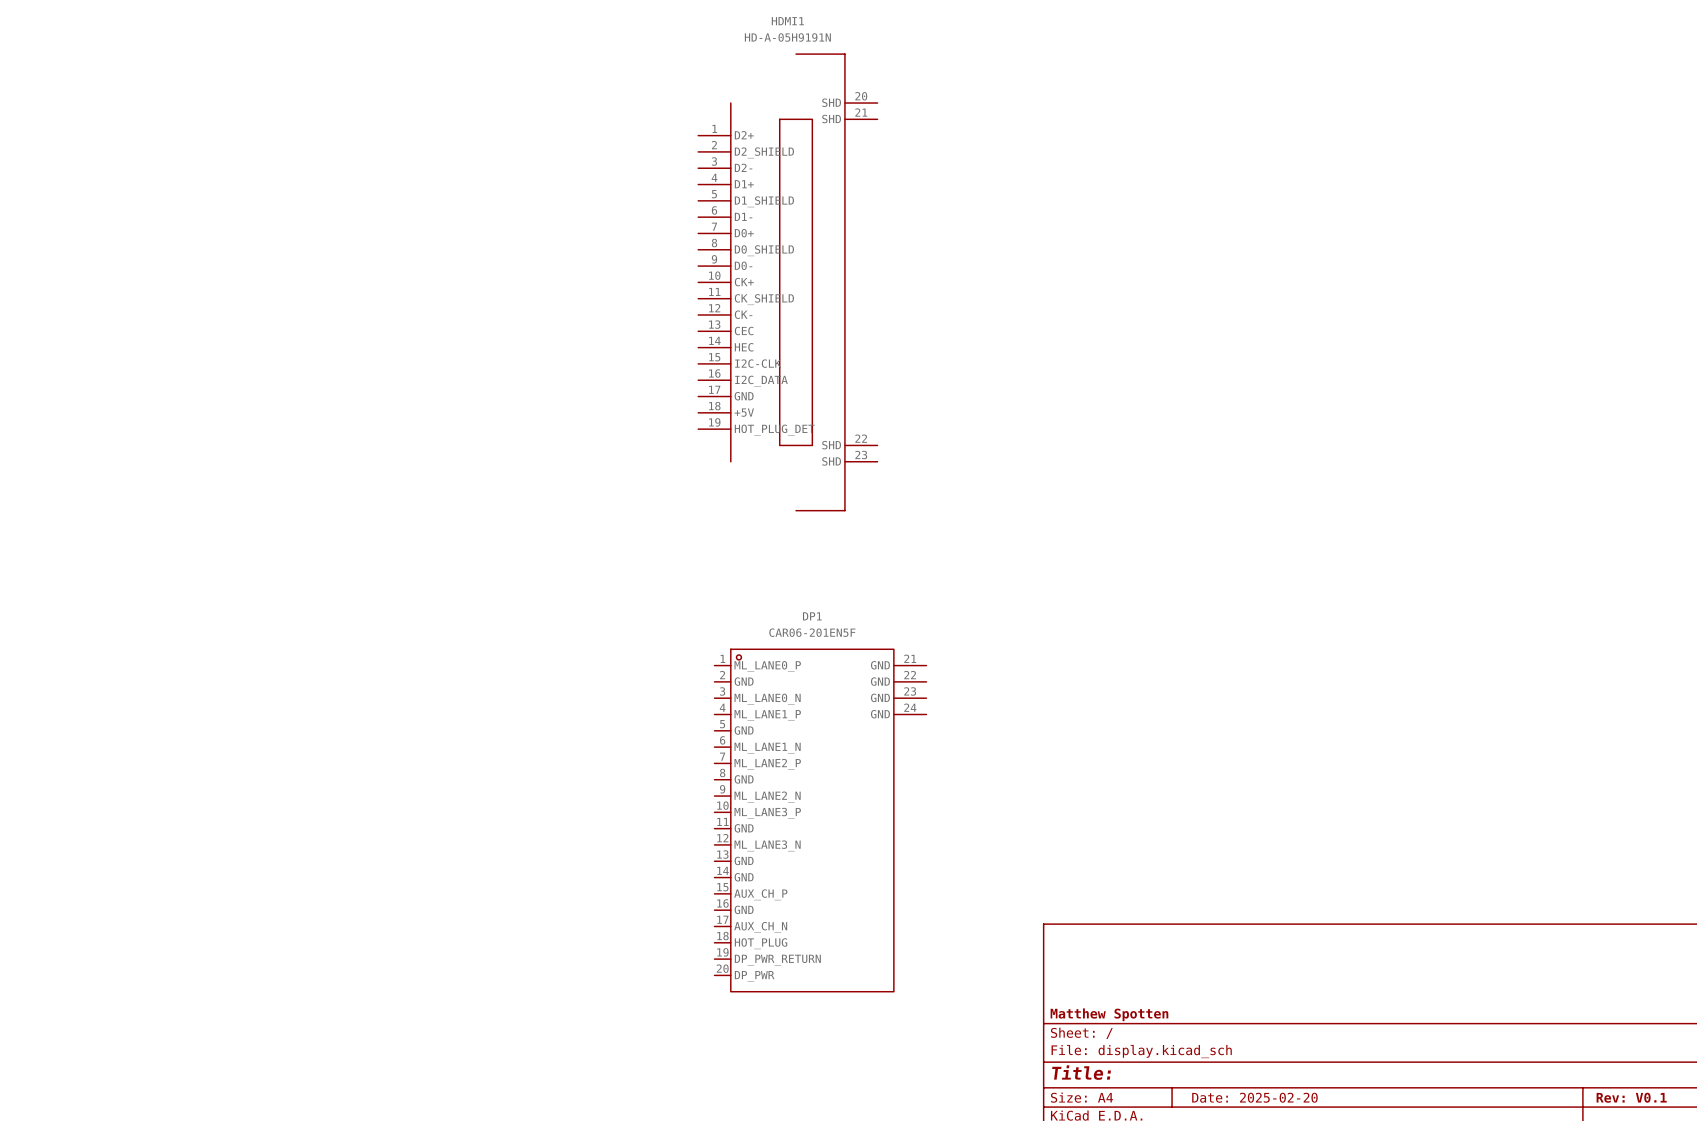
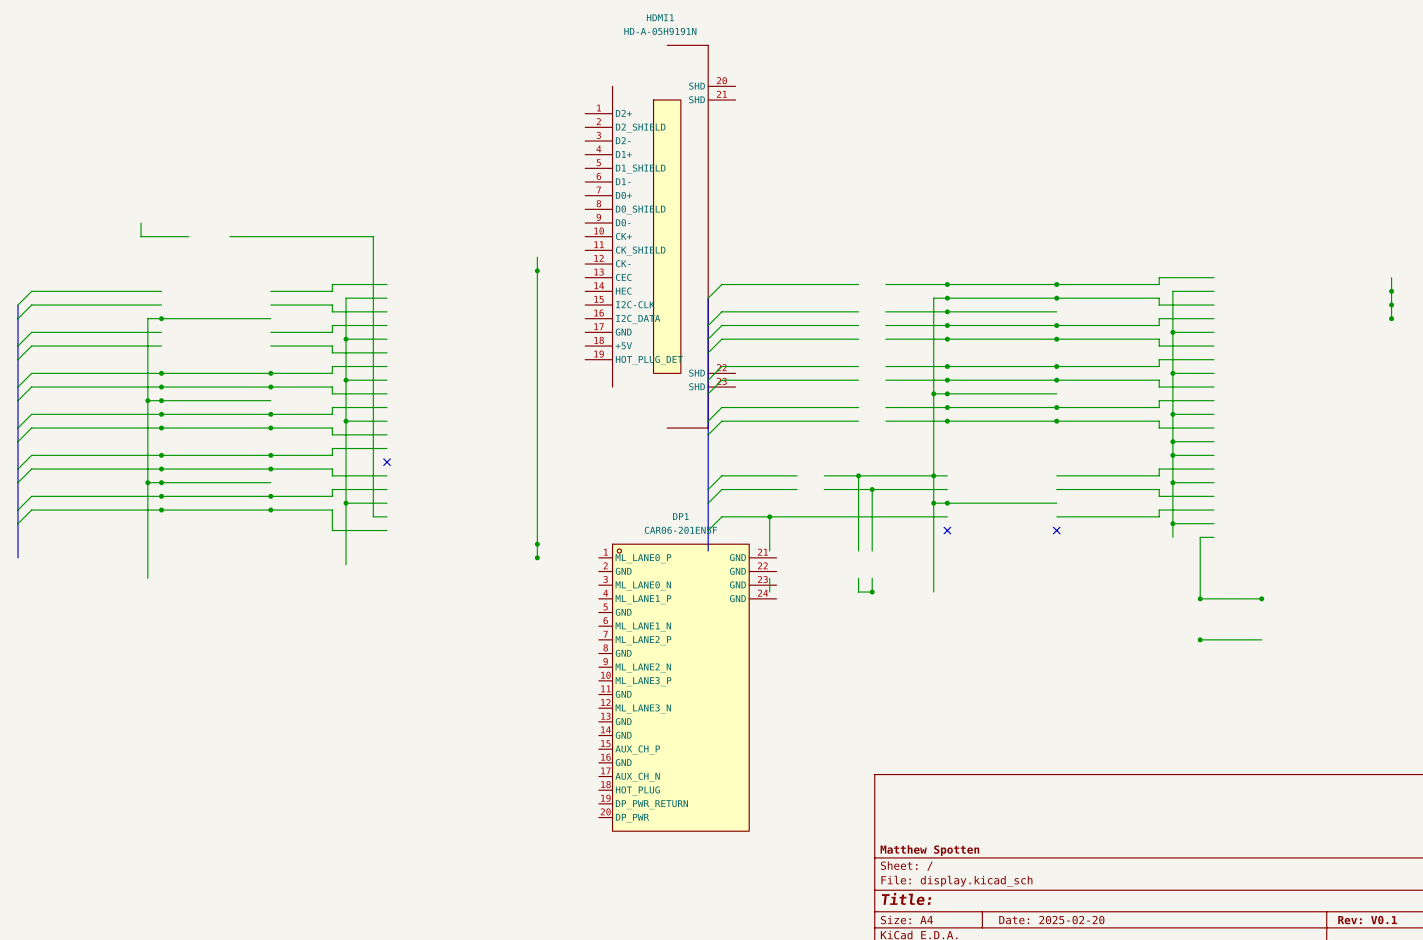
wire: none -> (141, 223) (141, 236) (188, 236)
wire: none -> (229, 236) (373, 236) (373, 516) (387, 516)
wire: none -> (537, 257) (537, 557)
junction: none -> (537, 270)
wire: none -> (1213, 277) (1159, 277) (1159, 284) (885, 284)
wire: none -> (1391, 277) (1391, 318)
wire: none -> (387, 284) (332, 284) (332, 291) (270, 291)
wire: none -> (858, 284) (721, 284) (708, 298)
junction: none -> (947, 284)
junction: none -> (1056, 284)
wire: none -> (161, 291) (31, 291) (18, 305)
wire: none -> (1213, 291) (1172, 291) (1172, 537)
junction: none -> (1391, 291)
wire: none -> (387, 298) (346, 298) (346, 564)
bus: none -> (708, 298) (708, 551)
junction: none -> (947, 298)
junction: none -> (1056, 298)
bus: none -> (18, 305) (18, 557)
wire: none -> (161, 305) (31, 305) (18, 318)
wire: none -> (270, 305) (332, 305) (332, 311) (387, 311)
wire: none -> (1213, 305) (1159, 305) (1159, 298) (933, 298) (933, 592)
junction: none -> (1391, 305)
wire: none -> (858, 311) (721, 311) (708, 325)
wire: none -> (885, 311) (1056, 311)
junction: none -> (947, 311)
junction: none -> (161, 318)
wire: none -> (270, 318) (147, 318) (147, 578)
wire: none -> (1213, 318) (1159, 318) (1159, 325) (885, 325)
junction: none -> (1391, 318)
wire: none -> (387, 325) (332, 325) (332, 332) (270, 332)
wire: none -> (858, 325) (721, 325) (708, 339)
junction: none -> (947, 325)
junction: none -> (1056, 325)
wire: none -> (161, 332) (31, 332) (18, 346)
wire: none -> (1172, 332) (1213, 332)
junction: none -> (1172, 332)
wire: none -> (346, 339) (387, 339)
junction: none -> (346, 339)
wire: none -> (858, 339) (721, 339) (708, 352)
wire: none -> (885, 339) (1159, 339) (1159, 346) (1213, 346)
junction: none -> (947, 339)
junction: none -> (1056, 339)
wire: none -> (161, 346) (31, 346) (18, 359)
wire: none -> (270, 346) (332, 346) (332, 352) (387, 352)
wire: none -> (1213, 359) (1159, 359) (1159, 366) (885, 366)
wire: none -> (387, 366) (332, 366) (332, 373) (31, 373) (18, 387)
wire: none -> (858, 366) (721, 366) (708, 380)
junction: none -> (947, 366)
junction: none -> (1056, 366)
junction: none -> (161, 373)
junction: none -> (270, 373)
wire: none -> (1172, 373) (1213, 373)
junction: none -> (1172, 373)
wire: none -> (346, 380) (387, 380)
junction: none -> (346, 380)
wire: none -> (858, 380) (721, 380) (708, 393)
wire: none -> (885, 380) (1159, 380) (1159, 387) (1213, 387)
junction: none -> (947, 380)
junction: none -> (1056, 380)
junction: none -> (161, 387)
junction: none -> (270, 387)
wire: none -> (387, 393) (332, 393) (332, 387) (31, 387) (18, 400)
wire: none -> (933, 393) (1056, 393)
junction: none -> (933, 393)
junction: none -> (947, 393)
wire: none -> (147, 400) (270, 400)
junction: none -> (147, 400)
junction: none -> (161, 400)
wire: none -> (1213, 400) (1159, 400) (1159, 407) (885, 407)
wire: none -> (387, 407) (332, 407) (332, 414) (31, 414) (18, 428)
wire: none -> (858, 407) (721, 407) (708, 421)
junction: none -> (947, 407)
junction: none -> (1056, 407)
junction: none -> (161, 414)
junction: none -> (270, 414)
wire: none -> (1172, 414) (1213, 414)
junction: none -> (1172, 414)
wire: none -> (346, 421) (387, 421)
junction: none -> (346, 421)
wire: none -> (858, 421) (721, 421) (708, 434)
wire: none -> (885, 421) (1159, 421) (1159, 428) (1213, 428)
junction: none -> (947, 421)
junction: none -> (1056, 421)
junction: none -> (161, 428)
junction: none -> (270, 428)
wire: none -> (387, 434) (332, 434) (332, 428) (31, 428) (18, 441)
wire: none -> (1172, 441) (1213, 441)
junction: none -> (1172, 441)
wire: none -> (387, 448) (332, 448) (332, 455) (31, 455) (18, 469)
junction: none -> (161, 455)
junction: none -> (270, 455)
wire: none -> (1172, 455) (1213, 455)
junction: none -> (1172, 455)
no-connect mark: none -> (387, 462)
junction: none -> (161, 469)
junction: none -> (270, 469)
wire: none -> (1213, 469) (1159, 469) (1159, 475) (1056, 475)
wire: none -> (387, 475) (332, 475) (332, 469) (31, 469) (18, 482)
wire: none -> (797, 475) (721, 475) (708, 489)
wire: none -> (824, 475) (947, 475)
wire: none -> (858, 475) (858, 551)
junction: none -> (858, 475)
junction: none -> (933, 475)
wire: none -> (147, 482) (270, 482)
junction: none -> (147, 482)
junction: none -> (161, 482)
wire: none -> (1172, 482) (1213, 482)
junction: none -> (1172, 482)
wire: none -> (387, 489) (332, 489) (332, 496) (31, 496) (18, 510)
wire: none -> (797, 489) (721, 489) (708, 503)
wire: none -> (824, 489) (947, 489)
wire: none -> (872, 489) (872, 551)
junction: none -> (872, 489)
wire: none -> (1056, 489) (1159, 489) (1159, 496) (1213, 496)
junction: none -> (161, 496)
junction: none -> (270, 496)
wire: none -> (346, 503) (387, 503)
junction: none -> (346, 503)
wire: none -> (933, 503) (1056, 503)
junction: none -> (933, 503)
junction: none -> (947, 503)
junction: none -> (161, 510)
junction: none -> (270, 510)
wire: none -> (1213, 510) (1159, 510) (1159, 516) (1056, 516)
wire: none -> (769, 516) (769, 551)
junction: none -> (769, 516)
wire: none -> (947, 516) (721, 516) (708, 530)
wire: none -> (18, 523) (31, 510) (332, 510) (332, 530) (387, 530)
wire: none -> (1172, 523) (1213, 523)
junction: none -> (1172, 523)
no-connect mark: none -> (947, 530)
no-connect mark: none -> (1056, 530)
wire: none -> (1213, 537) (1200, 537) (1200, 598) (1261, 598)
junction: none -> (537, 544)
junction: none -> (537, 557)
wire: none -> (769, 578) (769, 592)
wire: none -> (858, 578) (858, 592) (872, 592) (872, 578)
junction: none -> (872, 592)
junction: none -> (1200, 598)
junction: none -> (1261, 598)
wire: none -> (1200, 639) (1261, 639)
junction: none -> (1200, 639)

